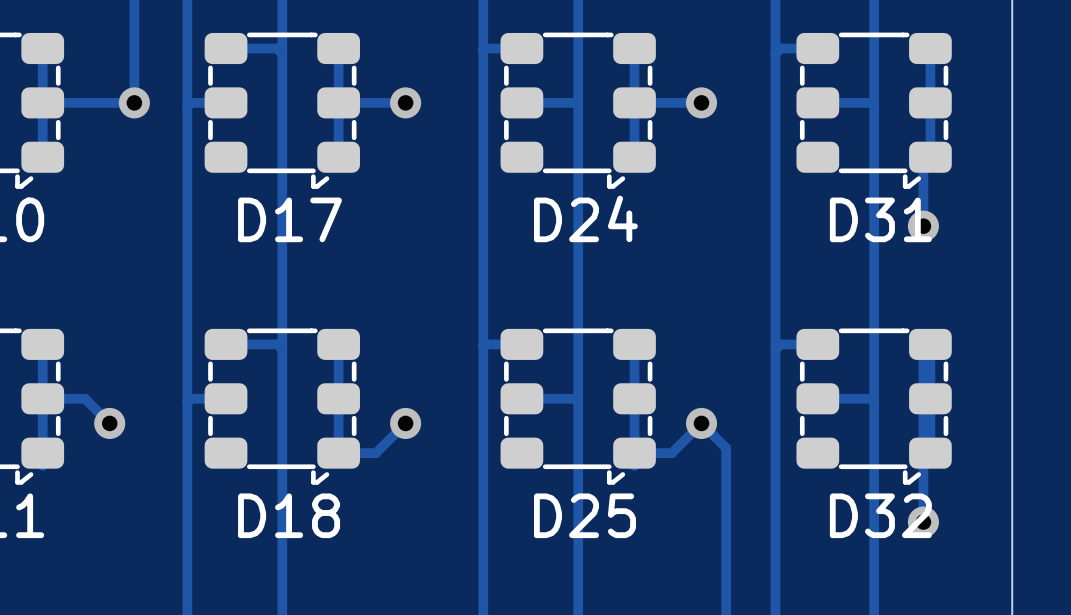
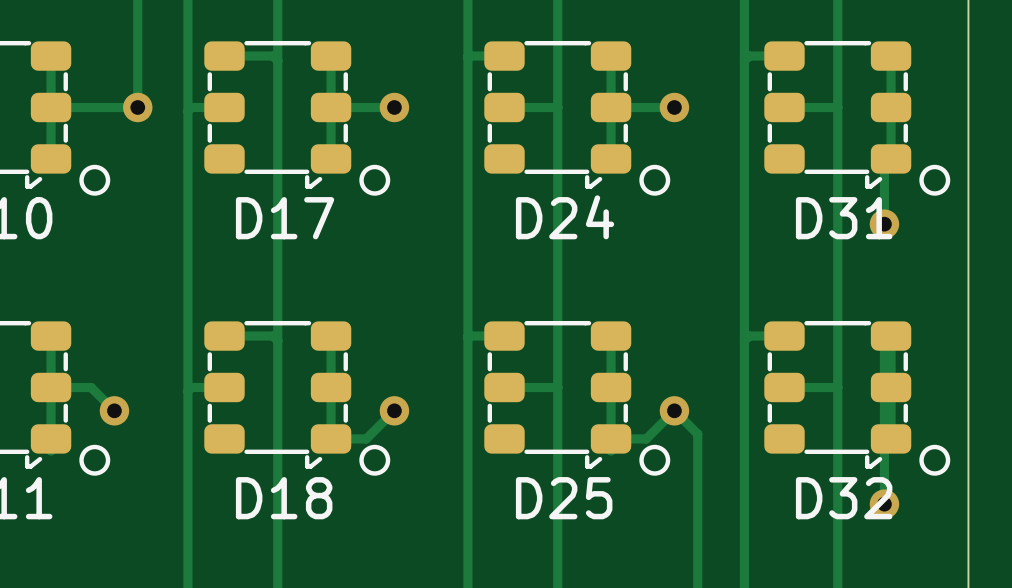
drawing: none -> [79, 164, 111, 196]
drawing: none -> [359, 164, 391, 196]
drawing: none -> [639, 164, 671, 196]
drawing: none -> [919, 164, 951, 196]
drawing: none -> [79, 444, 111, 476]
drawing: none -> [359, 444, 391, 476]
drawing: none -> [639, 444, 671, 476]
drawing: none -> [919, 444, 951, 476]

